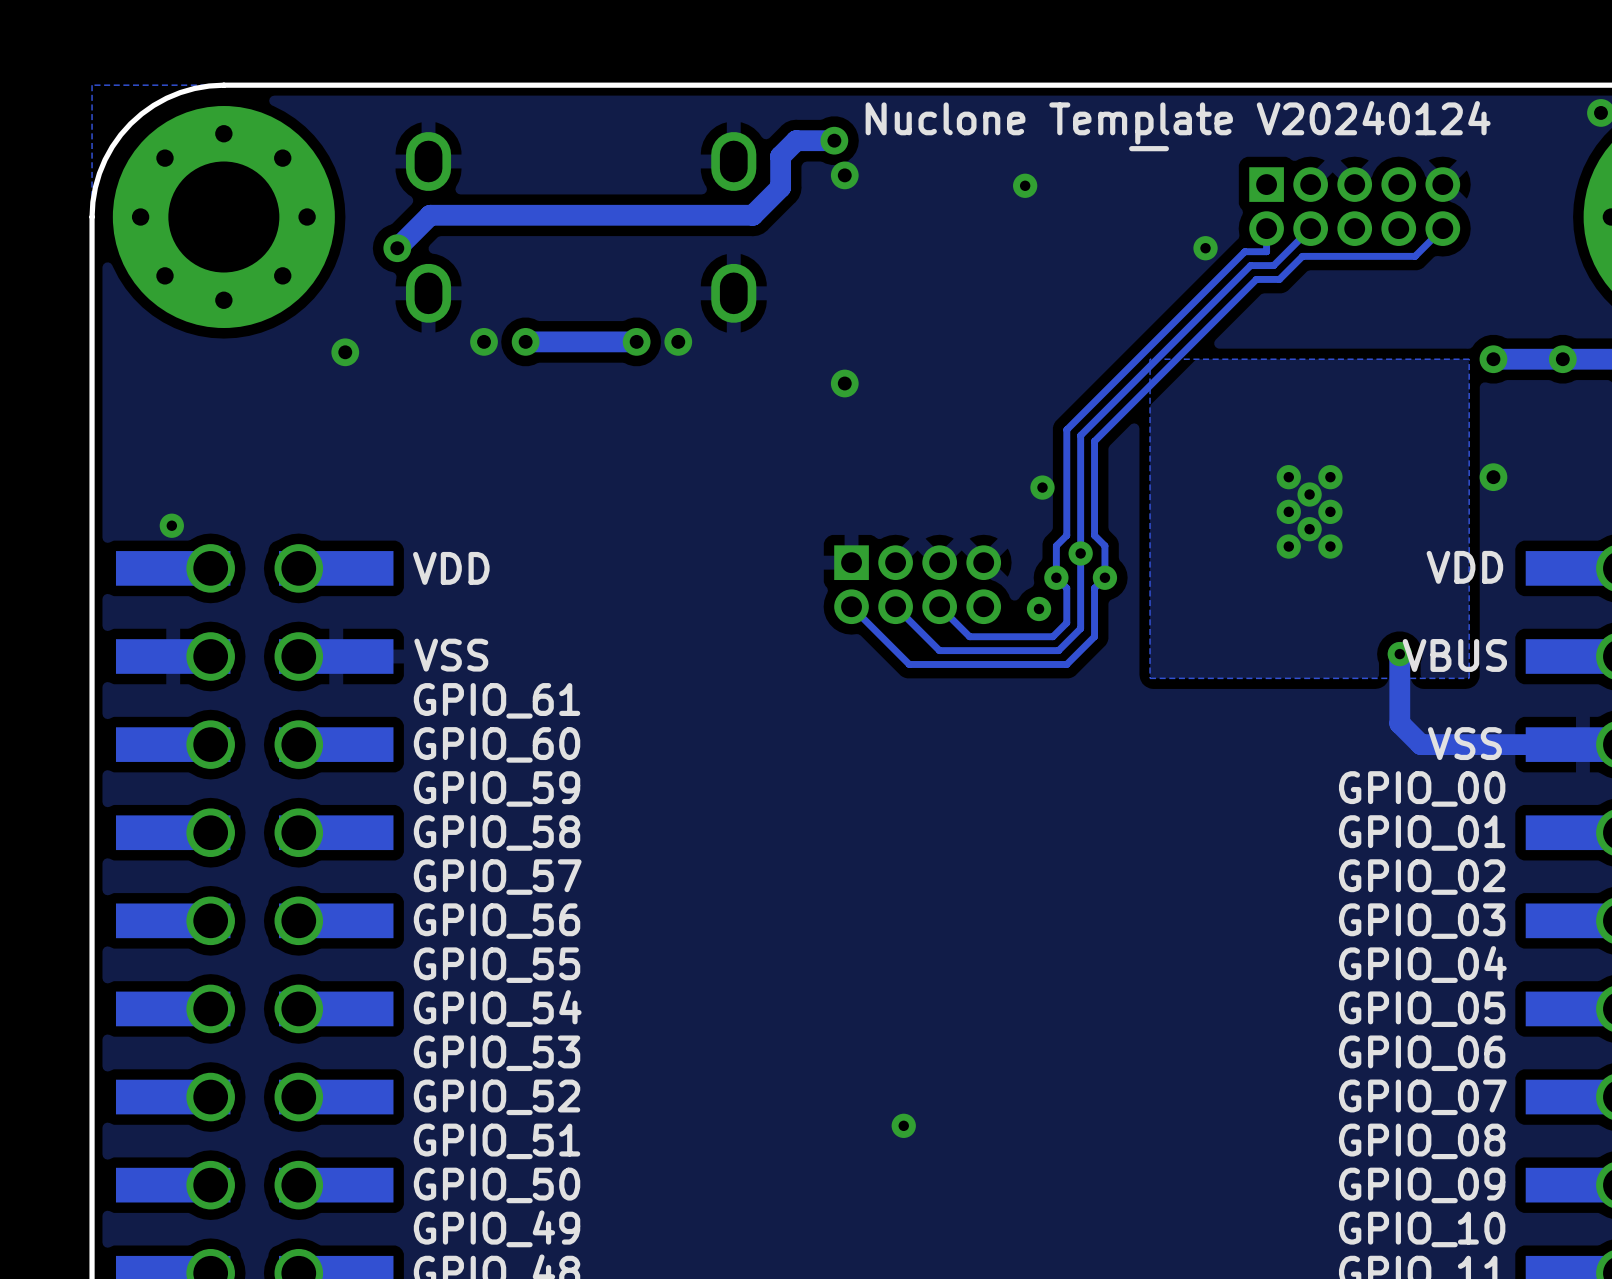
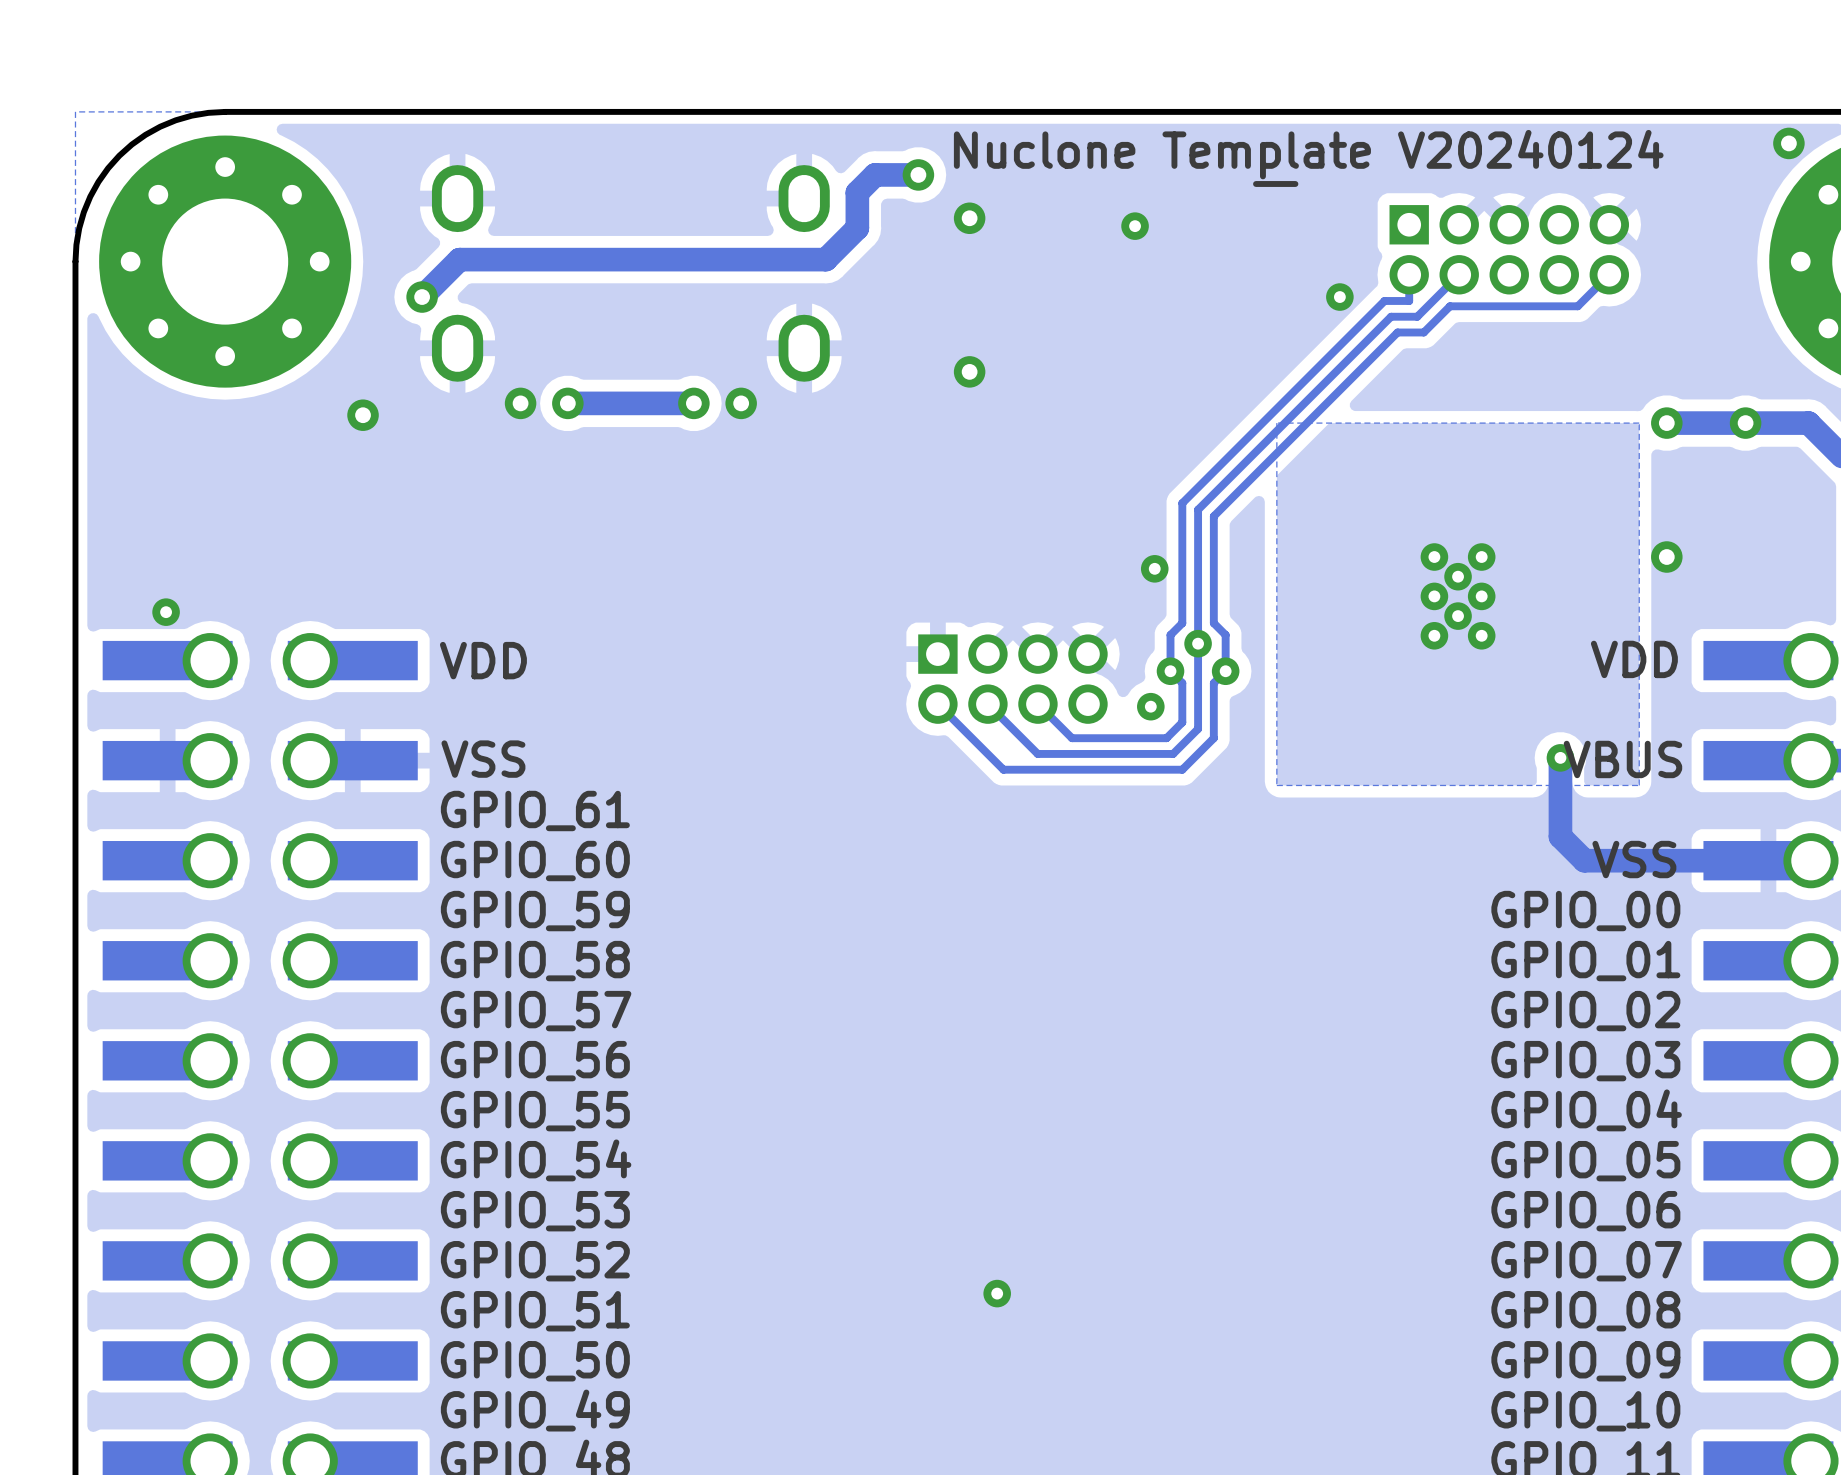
via position: (844, 175) -> (969, 218)
via: none -> (969, 371)
via: (844, 383) -> none

